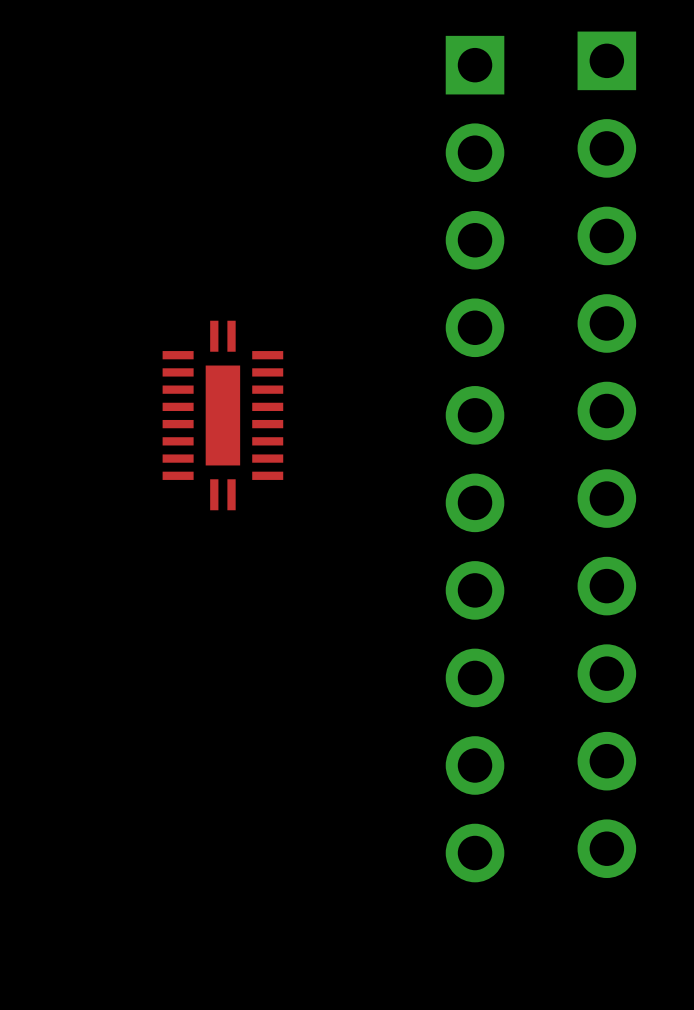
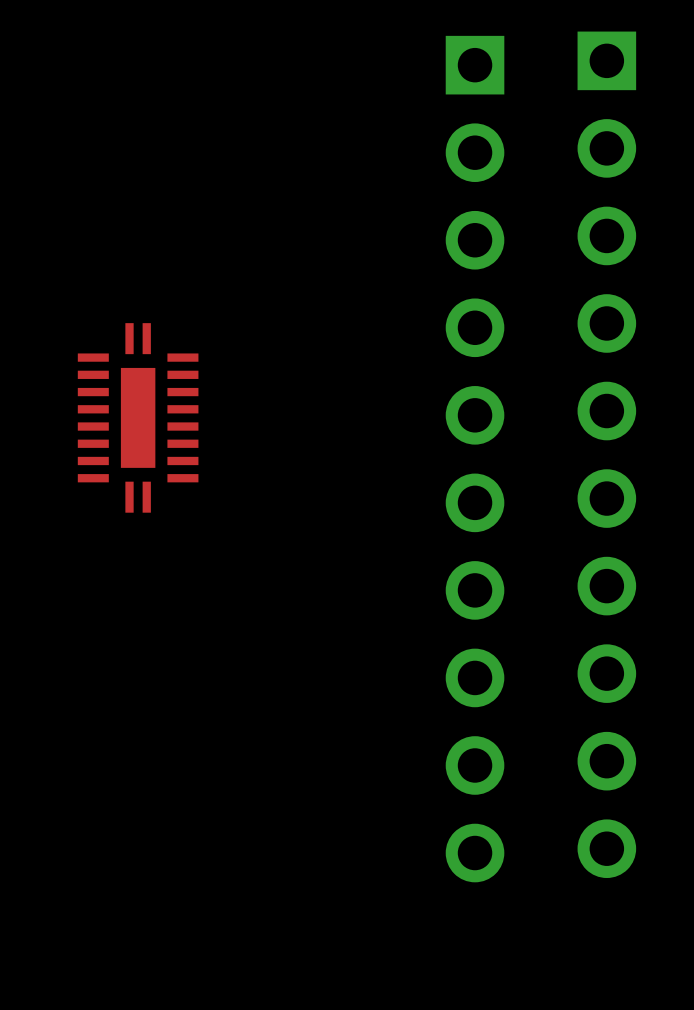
part position: (222, 415) -> (138, 417)

